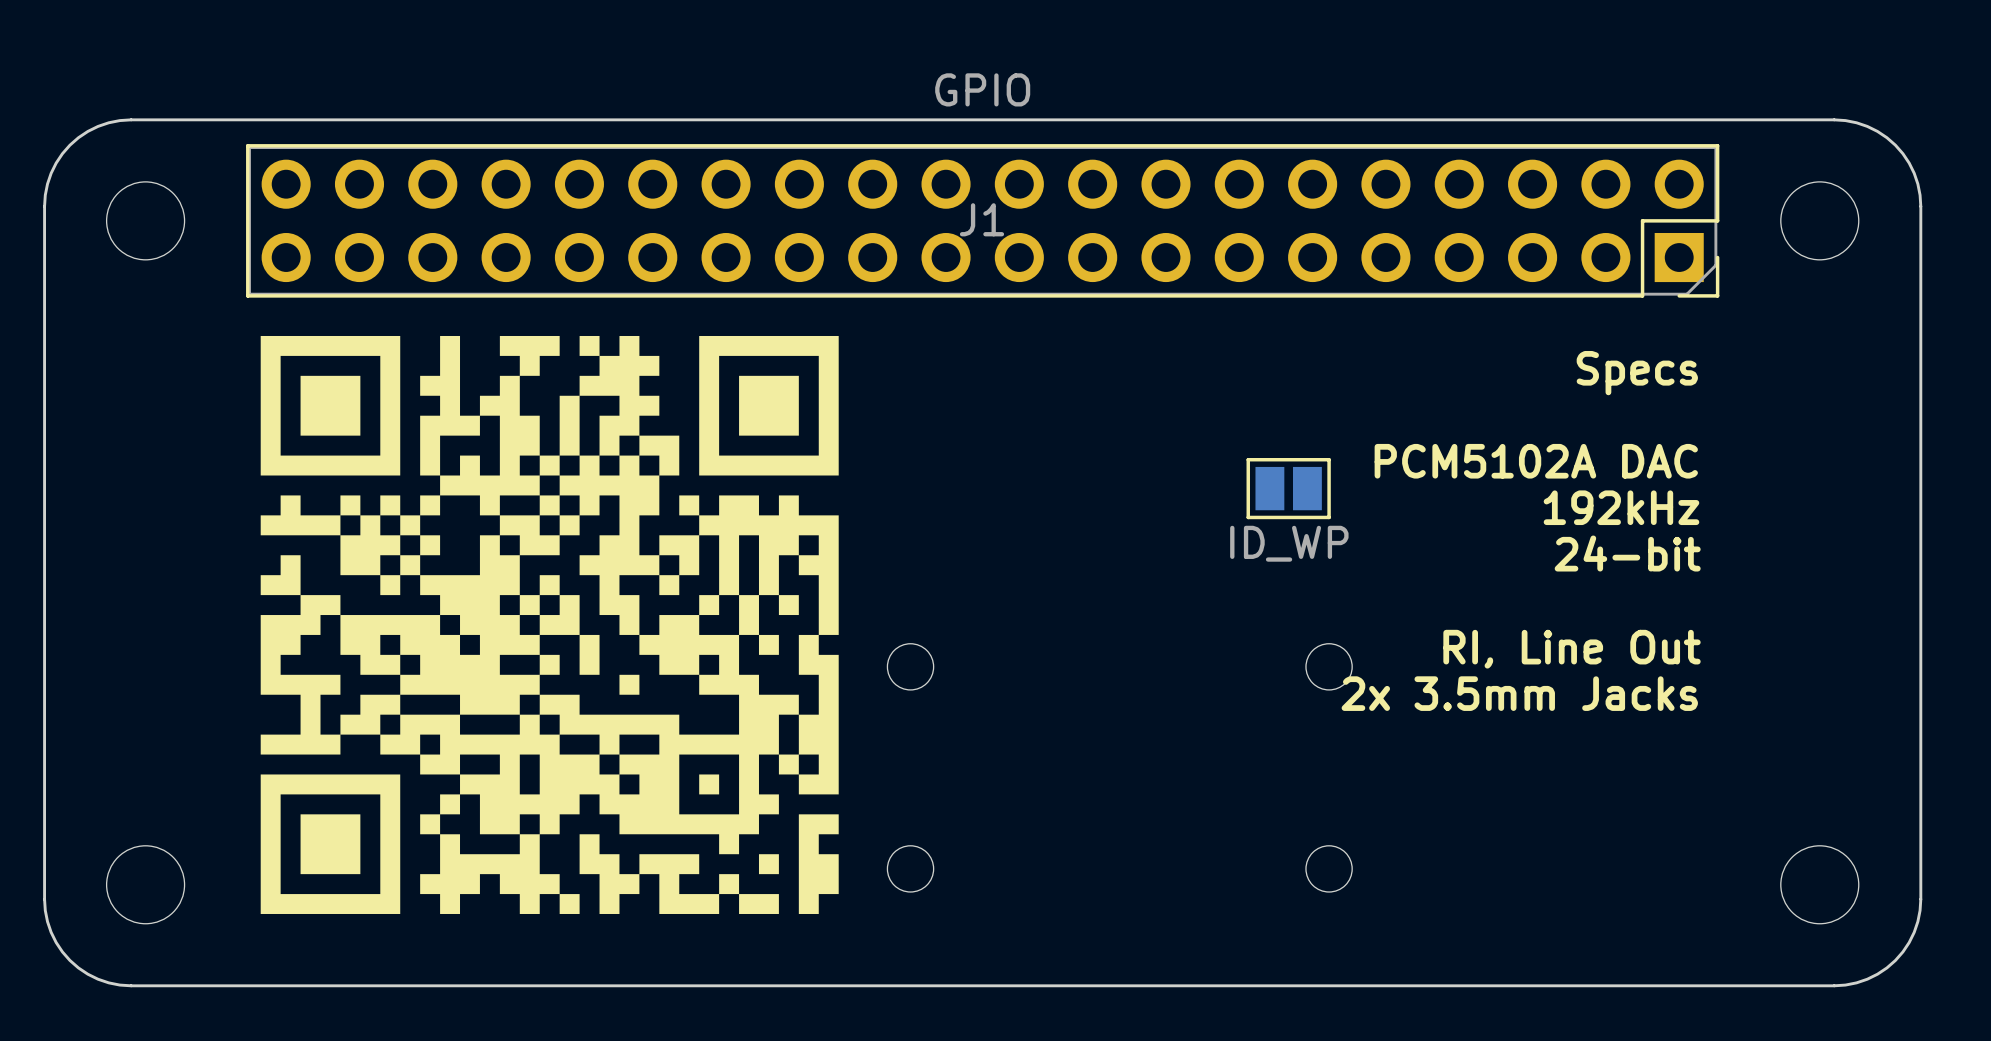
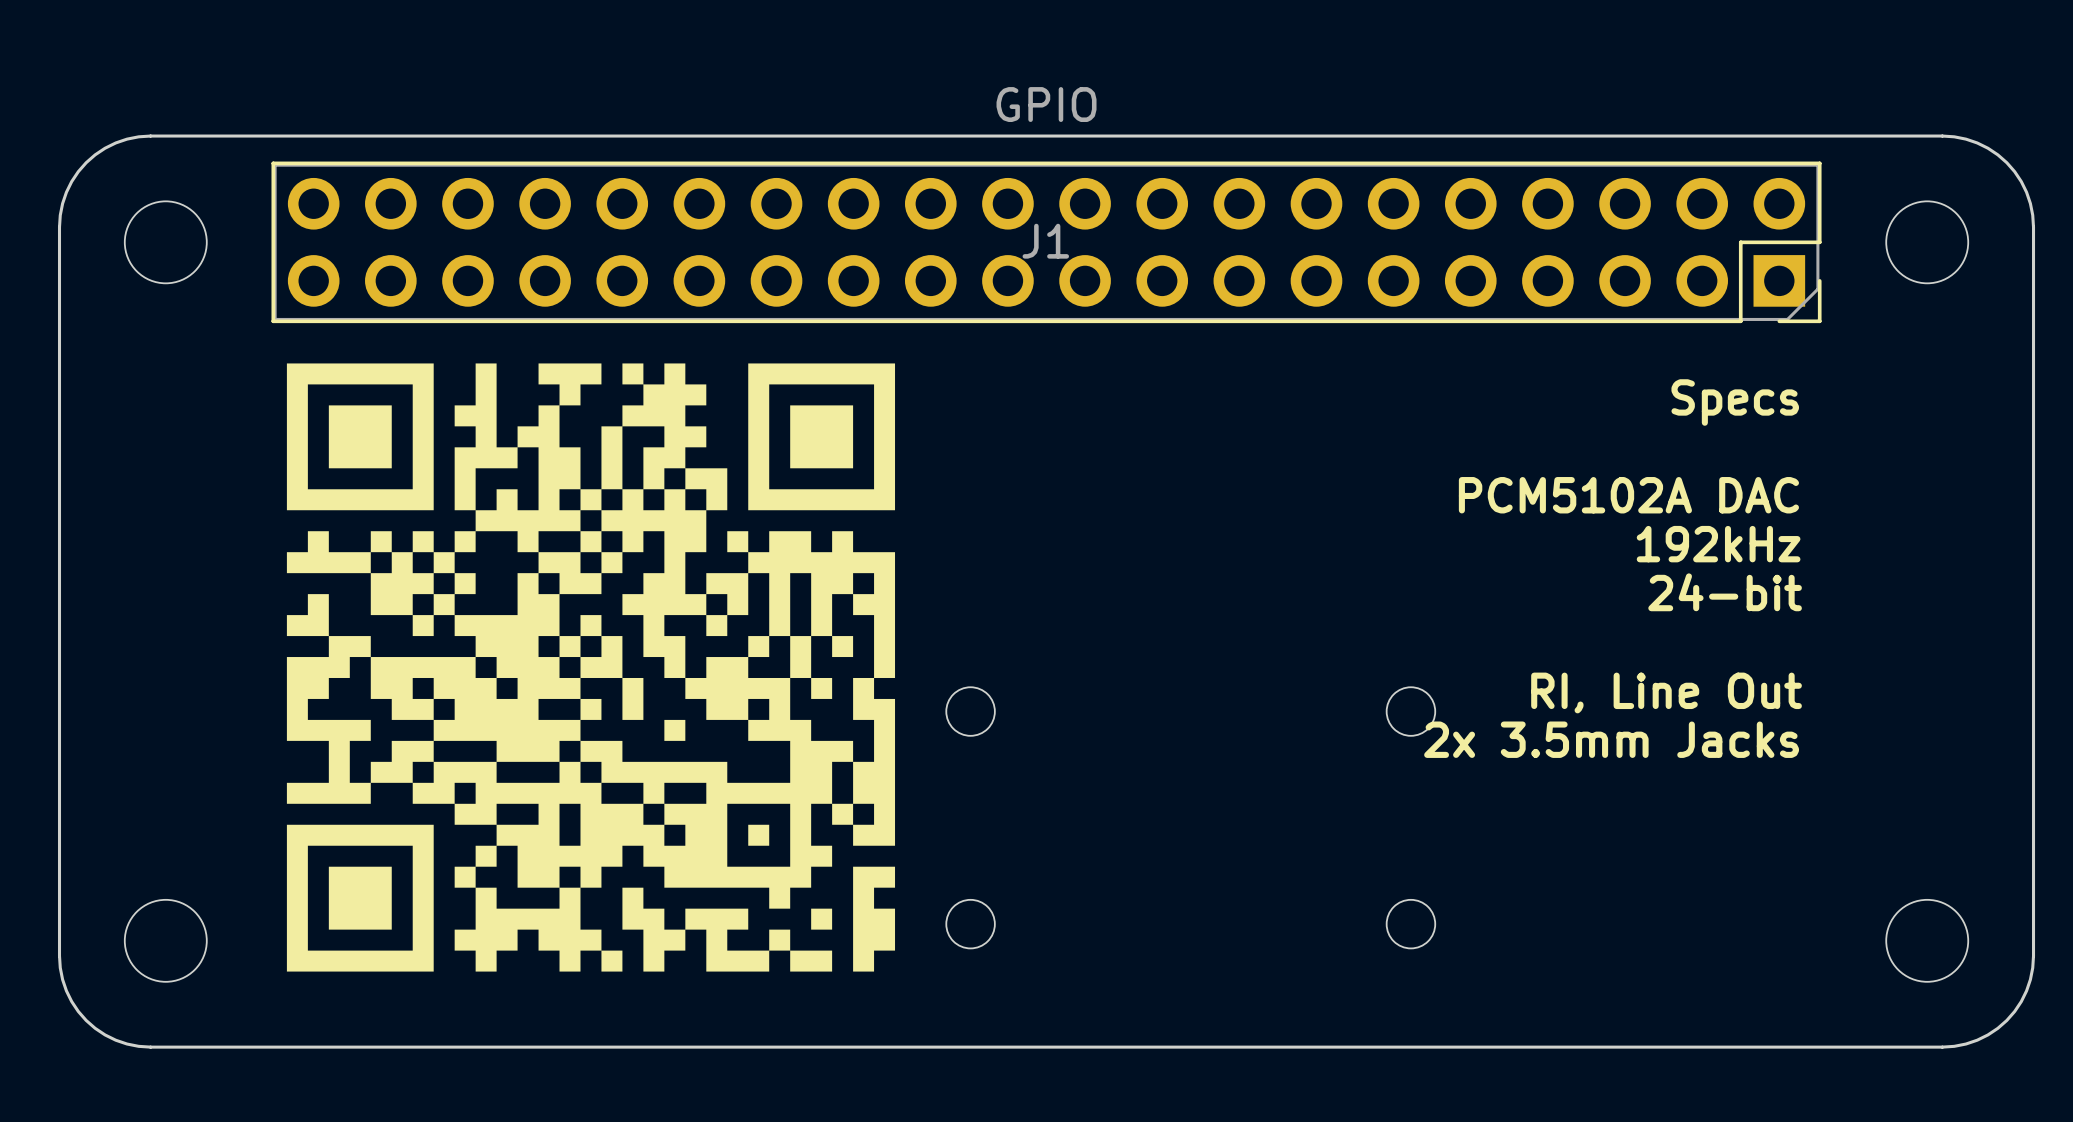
part: ID_WP (1288, 488) -> none

